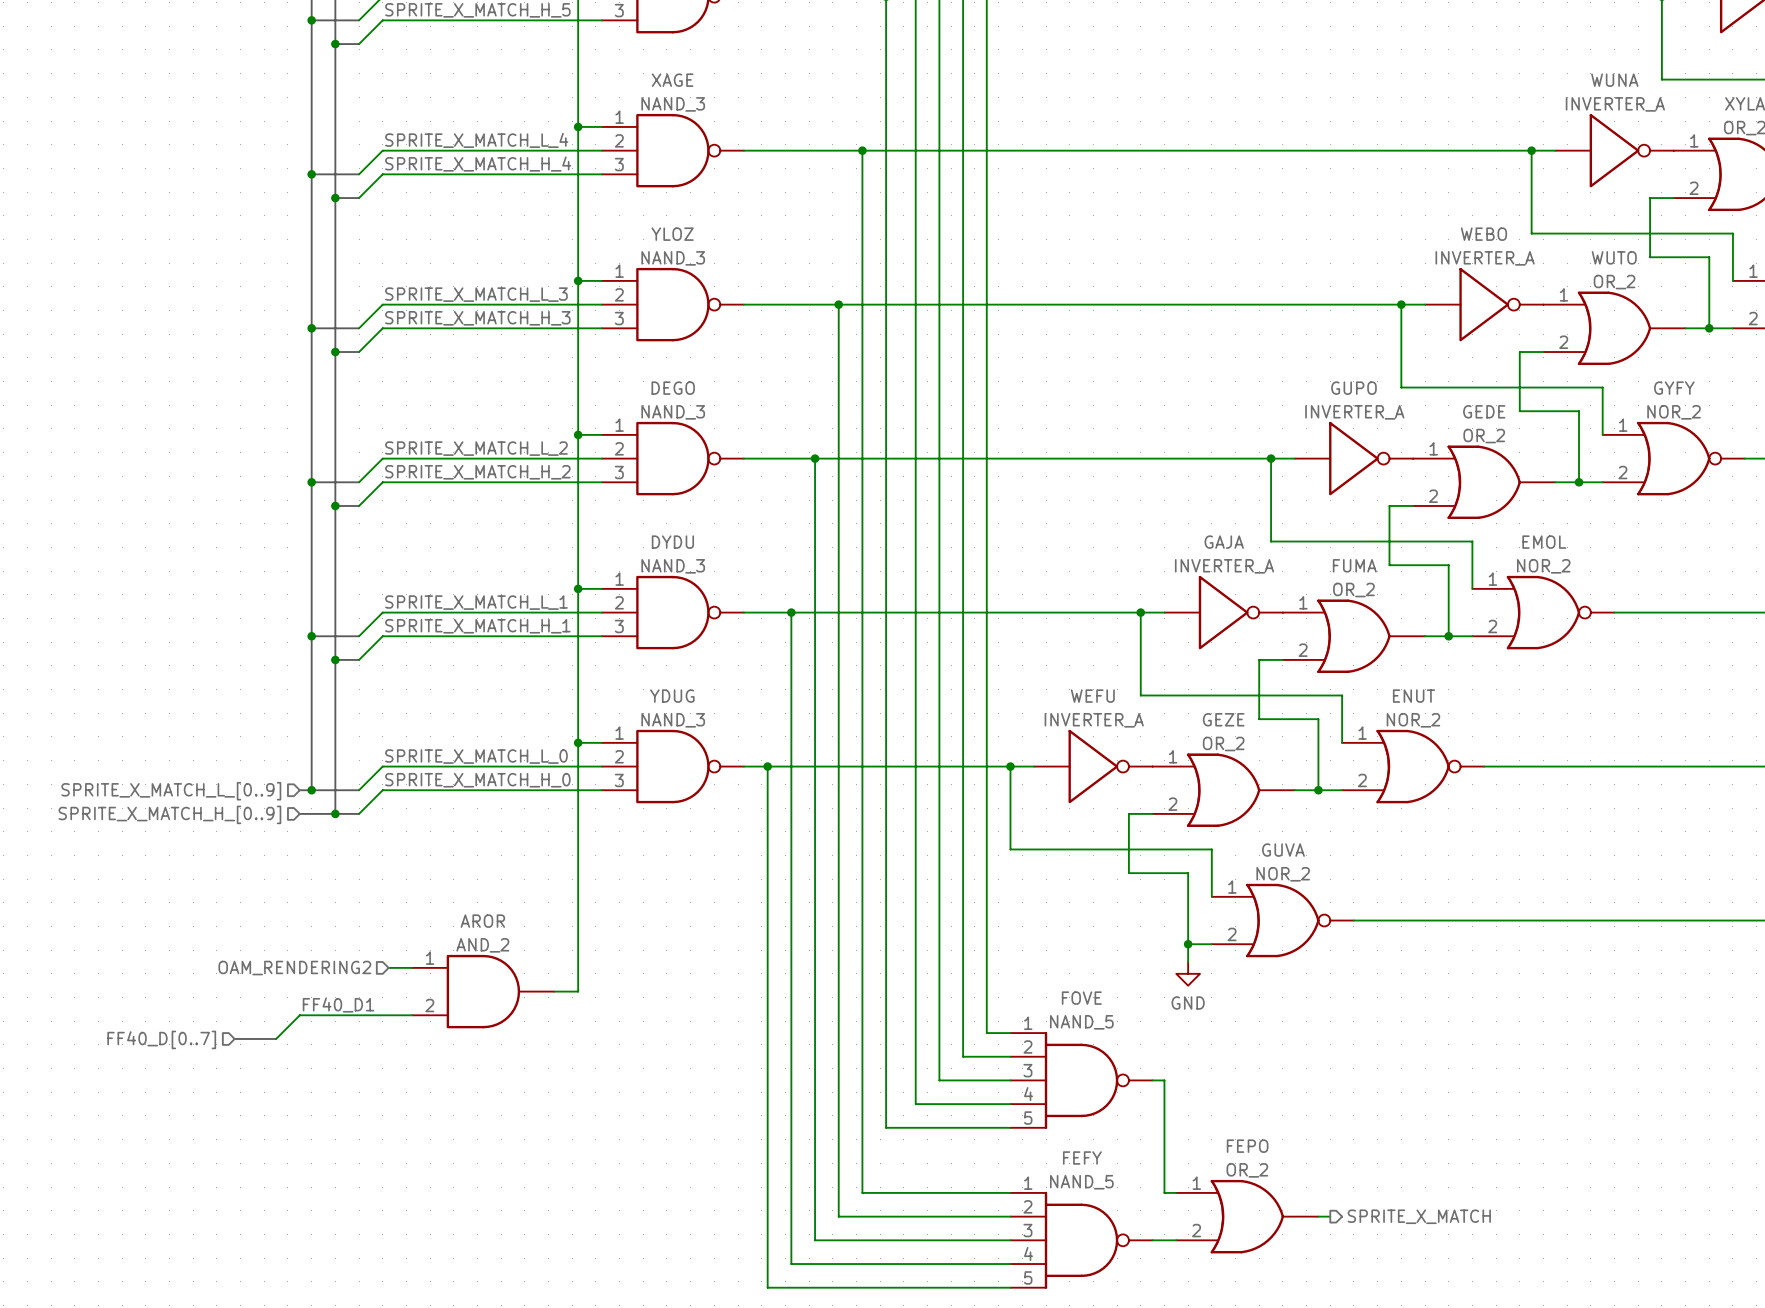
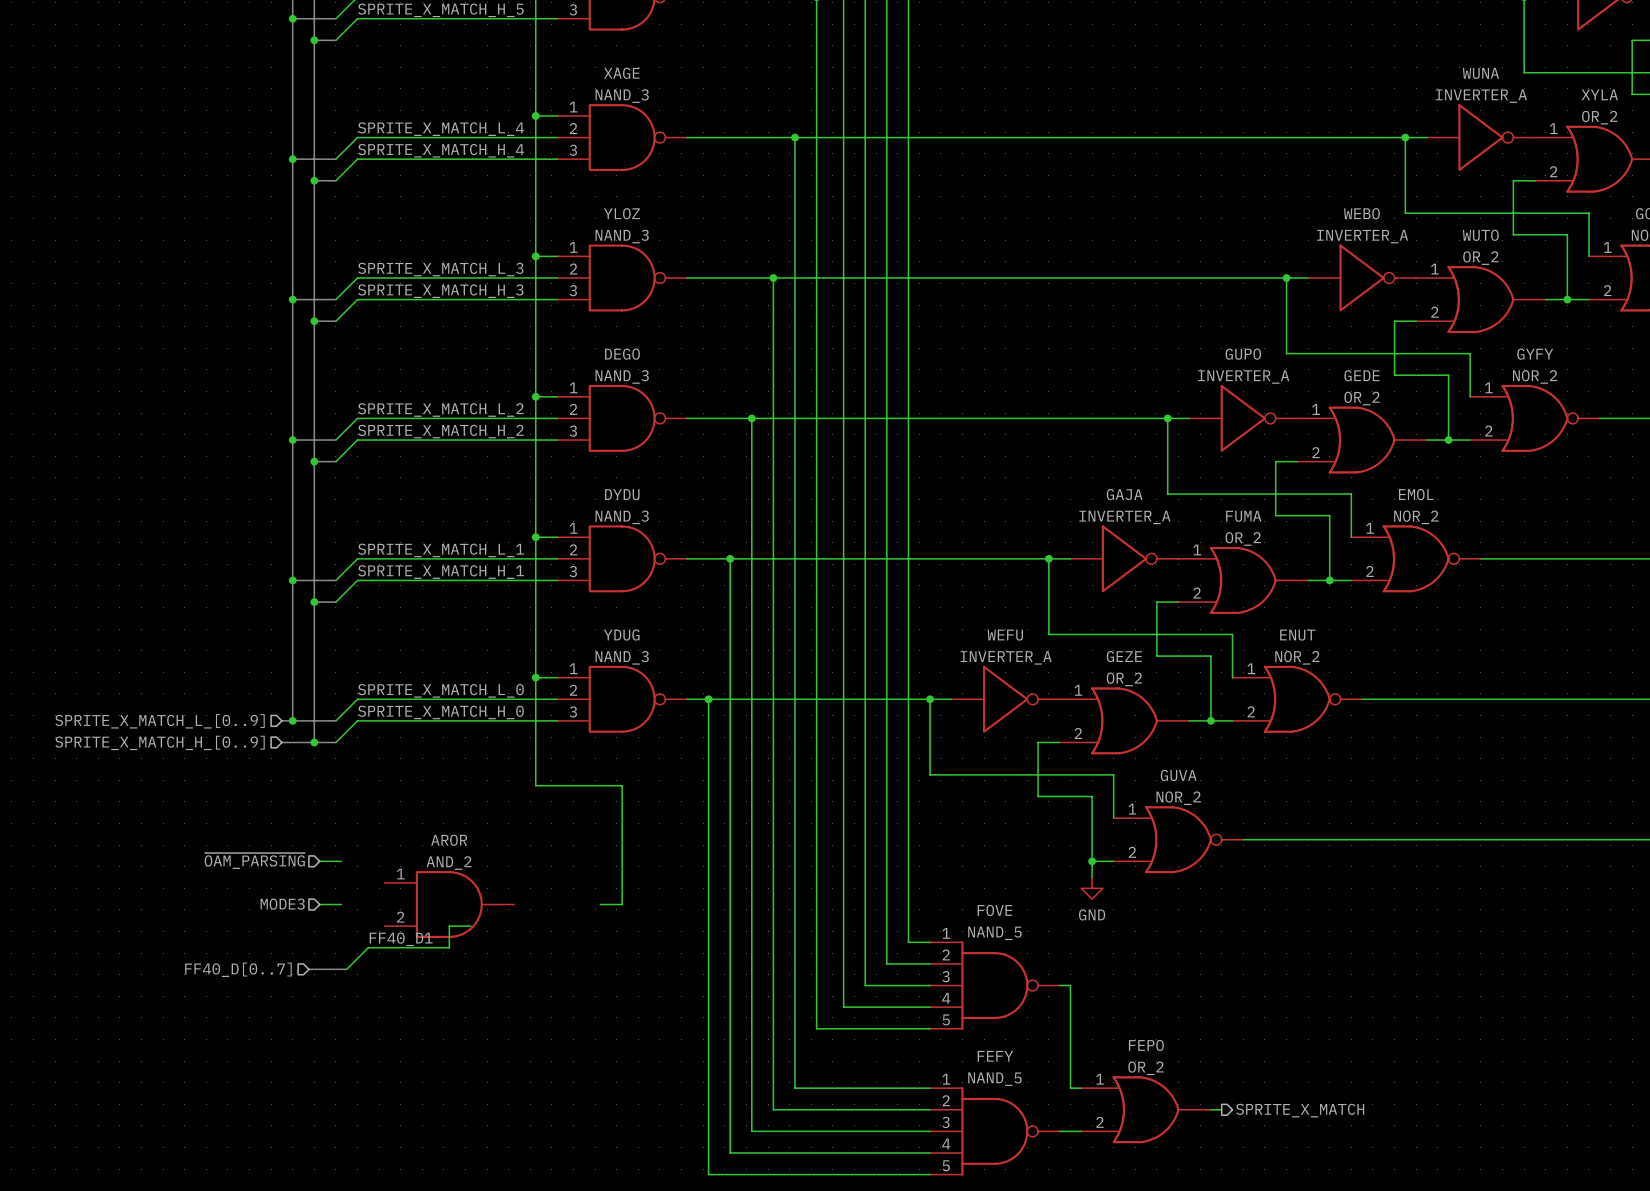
wire: (578, 861) (578, 991) (554, 991) -> (535, 785) (622, 785) (622, 904) (600, 904)
hierarchical label: none -> ~{OAM_PARSING} (254, 860)
wire: (388, 967) (412, 967) -> (319, 861) (341, 861)
hierarchical label: OAM_RENDERING2 (294, 968) -> none
hierarchical label: none -> MODE3 (282, 904)
wire: none -> (319, 904) (341, 904)
label position: FF40_D1 (338, 1005) -> FF40_D1 (401, 939)
wire: (412, 1015) (299, 1015) (276, 1038) -> none
wire: none -> (470, 926) (449, 926) (449, 947) (368, 947) (346, 969)
bus: (234, 1038) (276, 1038) -> (308, 969) (346, 969)
hierarchical label position: FF40_D[0..7] (161, 1039) -> FF40_D[0..7] (238, 969)

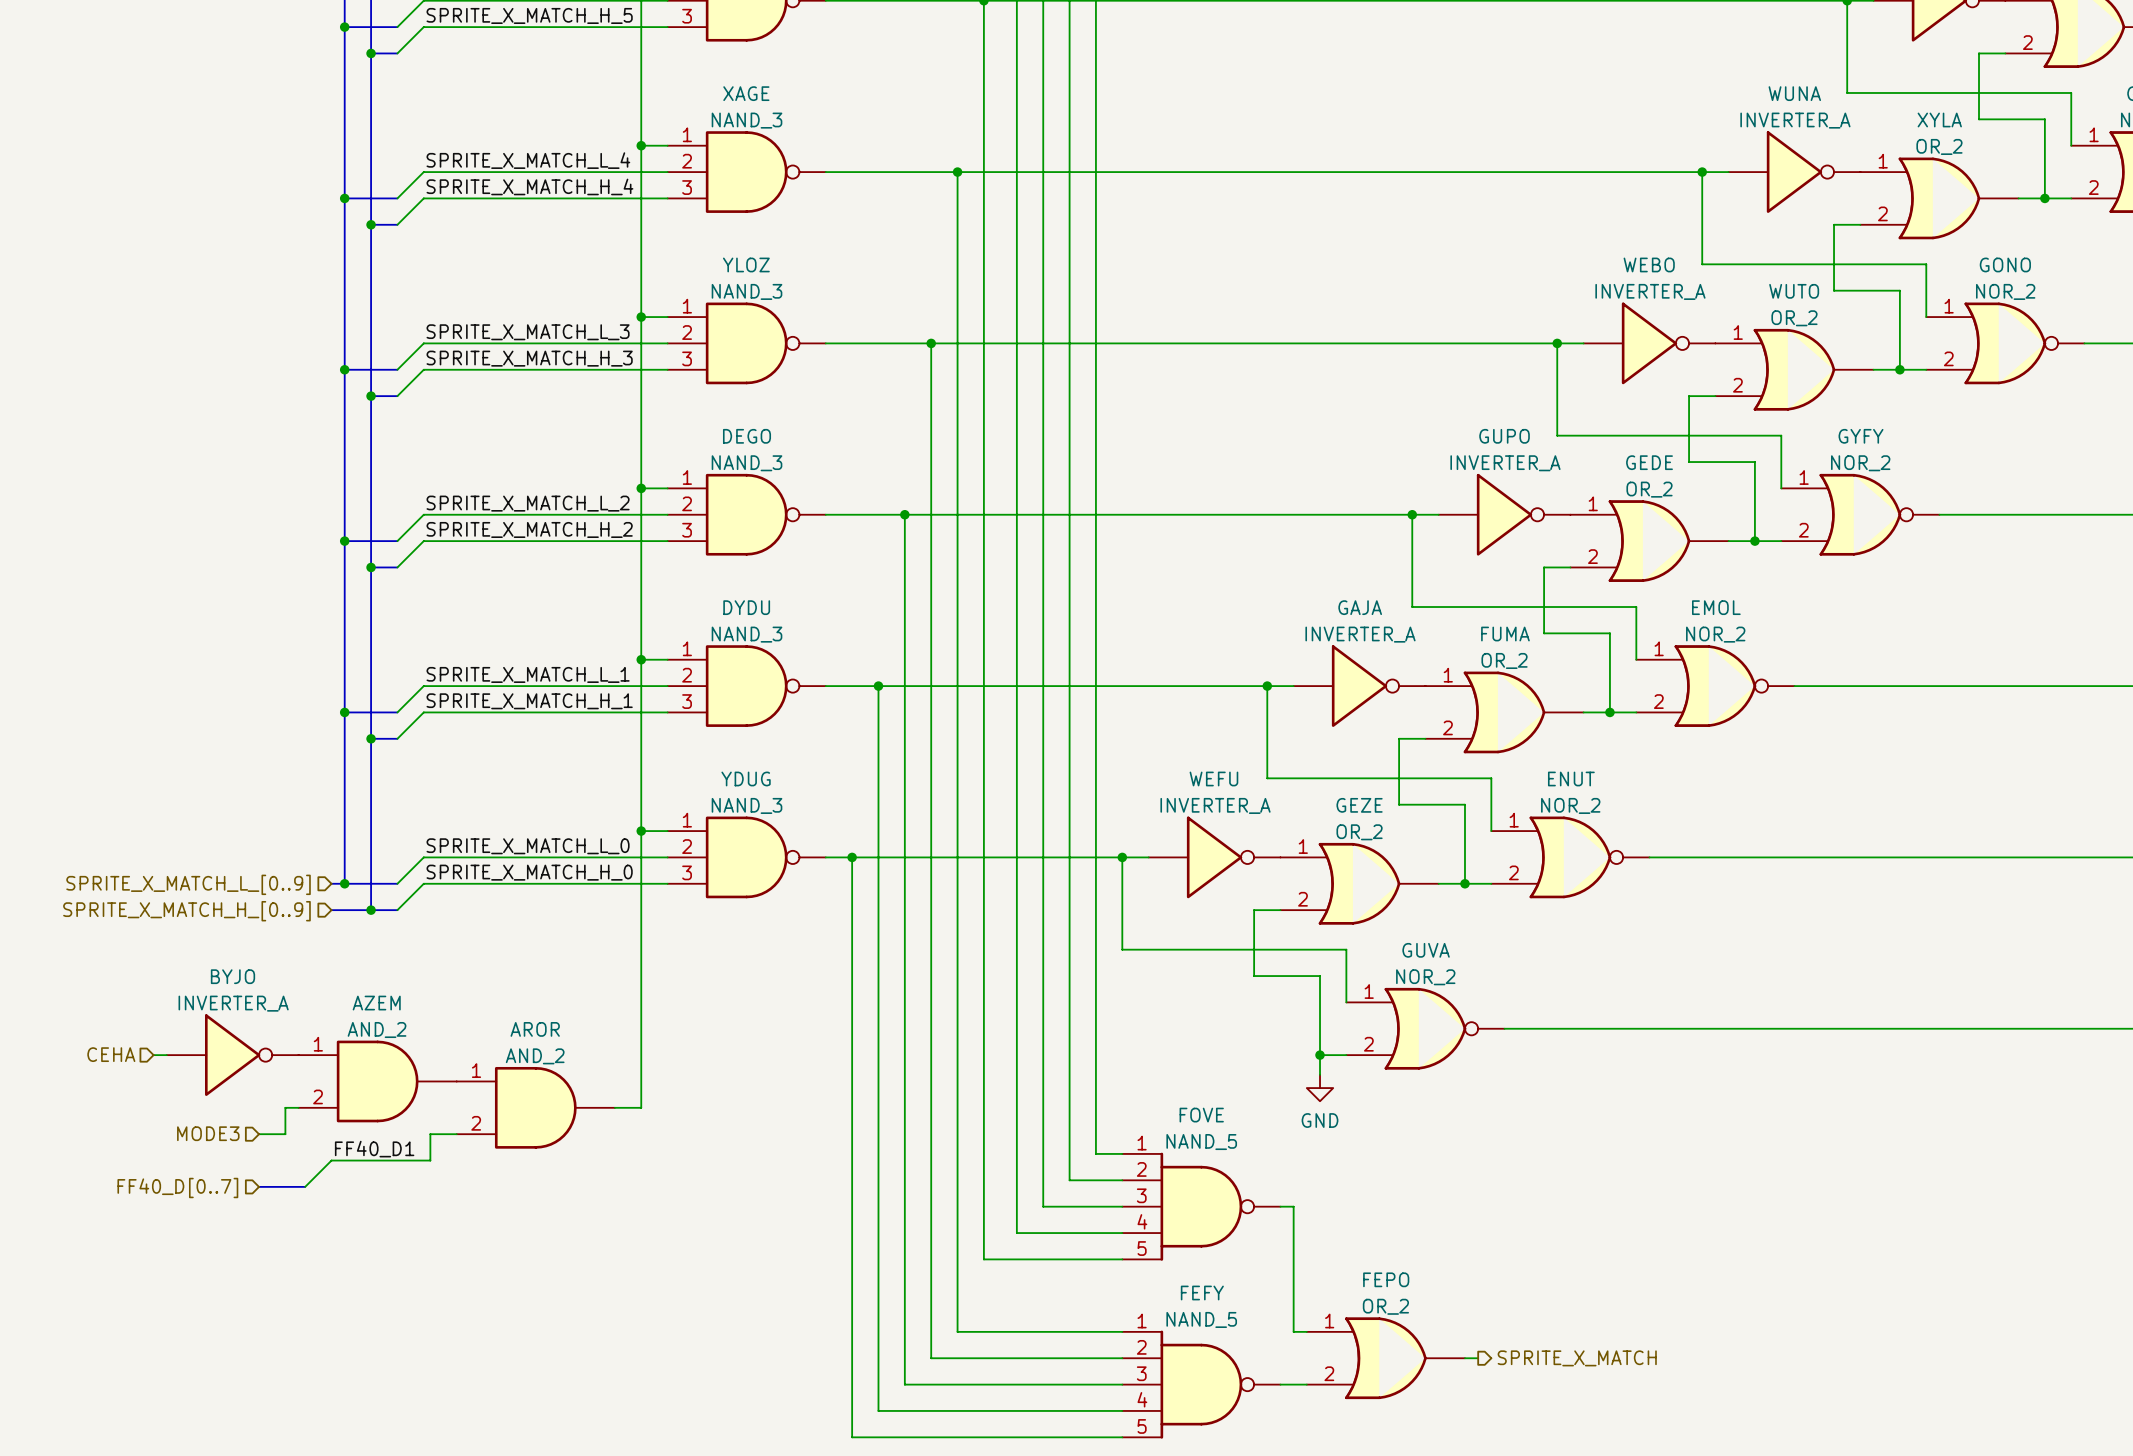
wire: (535, 785) (622, 785) (622, 904) (600, 904) -> (641, 962) (641, 1107) (614, 1107)
hierarchical label: none -> CEHA (111, 1054)
hierarchical label: ~{OAM_PARSING} (254, 860) -> none
wire: none -> (153, 1055) (166, 1055)
BYJO: none -> INVERTER_A (232, 1055)
AZEM: none -> AND_2 (377, 1081)
wire: none -> (298, 1107) (285, 1107) (285, 1134) (259, 1134)
hierarchical label position: MODE3 (282, 904) -> MODE3 (208, 1133)
wire: (470, 926) (449, 926) (449, 947) (368, 947) (346, 969) -> (456, 1134) (430, 1134) (430, 1160) (331, 1160) (305, 1186)
label position: FF40_D1 (401, 939) -> FF40_D1 (374, 1149)
hierarchical label position: FF40_D[0..7] (238, 969) -> FF40_D[0..7] (177, 1187)
bus: (308, 969) (346, 969) -> (259, 1186) (305, 1186)

